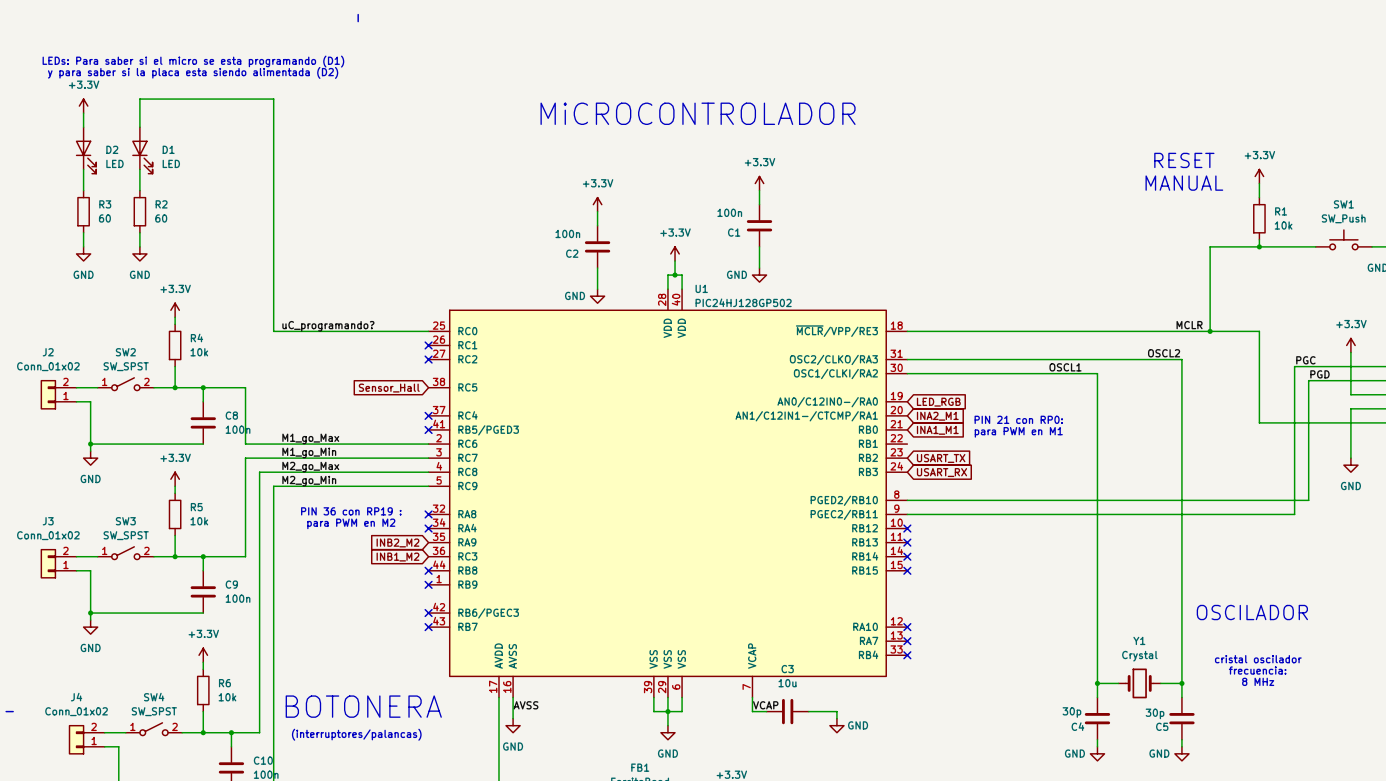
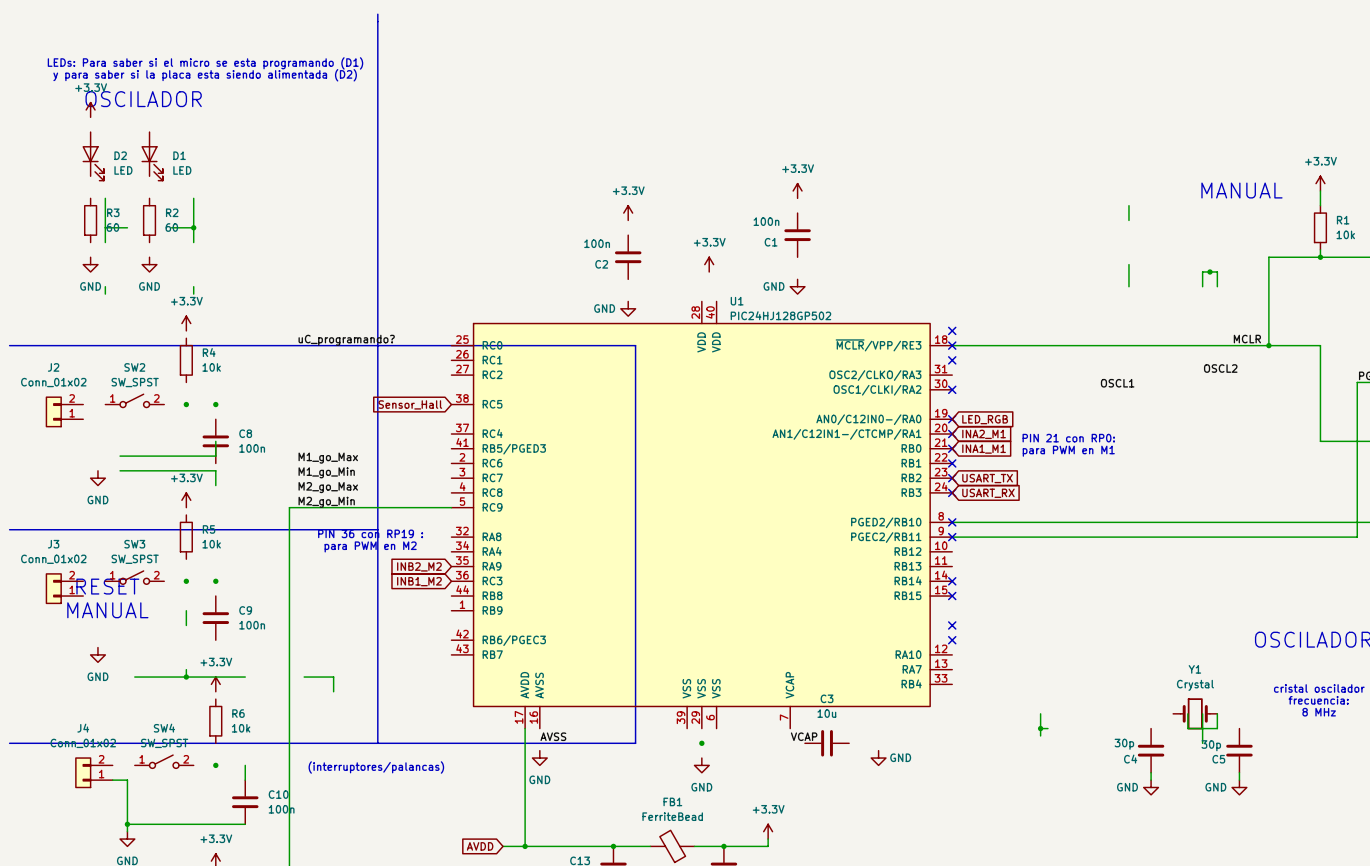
line: none -> (377, 21) (377, 743)
text: none -> OSCILADOR (143, 99)
wire: (83, 113) (83, 127) -> none
text: MiCROCONTROLADOR (698, 113) -> none
wire: (139, 127) (139, 99) (273, 99) (273, 331) (428, 331) -> none
text: RESET (1184, 160) -> none
wire: (83, 169) (83, 190) -> none
wire: (139, 169) (139, 190) -> none
wire: none -> (105, 198) (105, 242)
wire: none -> (193, 198) (193, 242)
wire: (759, 190) (759, 204) -> none
wire: none -> (1128, 205) (1128, 220)
wire: (597, 211) (597, 225) -> none
wire: none -> (105, 227) (127, 227)
wire: none -> (171, 227) (193, 227)
junction: none -> (193, 227)
wire: (83, 232) (83, 246) -> none
wire: (139, 232) (139, 246) -> none
wire: (759, 246) (759, 268) -> none
wire: none -> (1128, 264) (1128, 286)
wire: (675, 260) (675, 275) -> none
junction: none -> (1209, 271)
wire: (597, 268) (597, 289) -> none
wire: none -> (105, 286) (105, 294)
junction: (675, 275) -> none
wire: none -> (1202, 286) (1202, 271) (1217, 271) (1217, 286)
wire: (667, 289) (667, 275) (682, 275) (682, 289) -> none
wire: (175, 317) (175, 324) -> (193, 286) (193, 294)
no-connect mark: none -> (952, 330)
line: none -> (9, 345) (635, 345) (635, 743) (16, 743)
no-connect mark: none -> (952, 345)
no-connect mark: (428, 345) -> none
no-connect mark: none -> (952, 360)
no-connect mark: (428, 359) -> none
wire: (907, 359) (1181, 359) (1181, 697) -> none
wire: (175, 366) (175, 387) -> none
wire: (907, 373) (1097, 373) (1097, 697) -> none
no-connect mark: none -> (952, 389)
wire: (76, 387) (97, 387) -> none
wire: (153, 387) (245, 387) (245, 444) (428, 444) -> none
wire: (203, 387) (203, 401) -> none
wire: (76, 401) (90, 401) (90, 451) -> none
no-connect mark: none -> (952, 419)
no-connect mark: (428, 415) -> none
no-connect mark: none -> (952, 434)
wire: none -> (215, 441) (215, 456) (120, 456)
no-connect mark: (428, 429) -> none
no-connect mark: none -> (952, 448)
wire: (90, 444) (203, 444) -> none
junction: (90, 444) -> none
no-connect mark: none -> (952, 463)
wire: none -> (120, 470) (215, 470) (215, 485)
wire: (428, 458) (245, 458) (245, 556) (153, 556) -> none
no-connect mark: none -> (952, 478)
wire: (428, 472) (259, 472) (259, 732) (182, 732) -> none
no-connect mark: none -> (952, 492)
wire: (175, 486) (175, 493) -> none
no-connect mark: none -> (952, 522)
line: none -> (9, 529) (377, 529)
no-connect mark: (428, 514) -> none
no-connect mark: none -> (952, 537)
no-connect mark: (428, 528) -> none
no-connect mark: (907, 528) -> none
wire: (175, 535) (175, 556) -> none
no-connect mark: (907, 542) -> none
wire: (76, 556) (97, 556) -> none
wire: (203, 556) (203, 570) -> (186, 610) (186, 625)
text: none -> RESET (107, 586)
wire: (76, 570) (90, 570) (90, 620) -> none
no-connect mark: (428, 570) -> none
text: none -> MANUAL (107, 610)
no-connect mark: (428, 584) -> none
no-connect mark: none -> (952, 625)
wire: (90, 613) (203, 613) -> none
junction: (90, 613) -> none
no-connect mark: (428, 613) -> none
no-connect mark: none -> (952, 640)
no-connect mark: (428, 627) -> none
no-connect mark: (907, 627) -> none
no-connect mark: (907, 641) -> none
wire: none -> (134, 677) (245, 677)
junction: none -> (186, 677)
wire: none -> (304, 677) (333, 677) (333, 691)
no-connect mark: (907, 655) -> none
wire: (203, 662) (203, 669) -> (186, 669) (186, 677)
wire: none -> (1040, 713) (1040, 735)
wire: (1097, 683) (1118, 683) -> none
junction: (1097, 683) -> none
wire: none -> (1202, 713) (1202, 743)
wire: (1160, 683) (1181, 683) -> (1217, 713) (1217, 728) (1187, 728) (1187, 713)
junction: (1181, 683) -> none
wire: (513, 697) (513, 718) -> none
wire: (653, 697) (653, 711) (682, 711) (682, 697) -> none
wire: (667, 697) (667, 725) -> none
wire: (752, 697) (752, 711) (766, 711) -> none
wire: none -> (1040, 728) (1047, 728)
junction: none -> (1040, 728)
text: BOTONERA (363, 706) -> none
wire: (203, 711) (203, 732) -> none
wire: (808, 711) (836, 711) (836, 718) -> none
wire: (104, 732) (125, 732) -> none
junction: (231, 732) -> none

